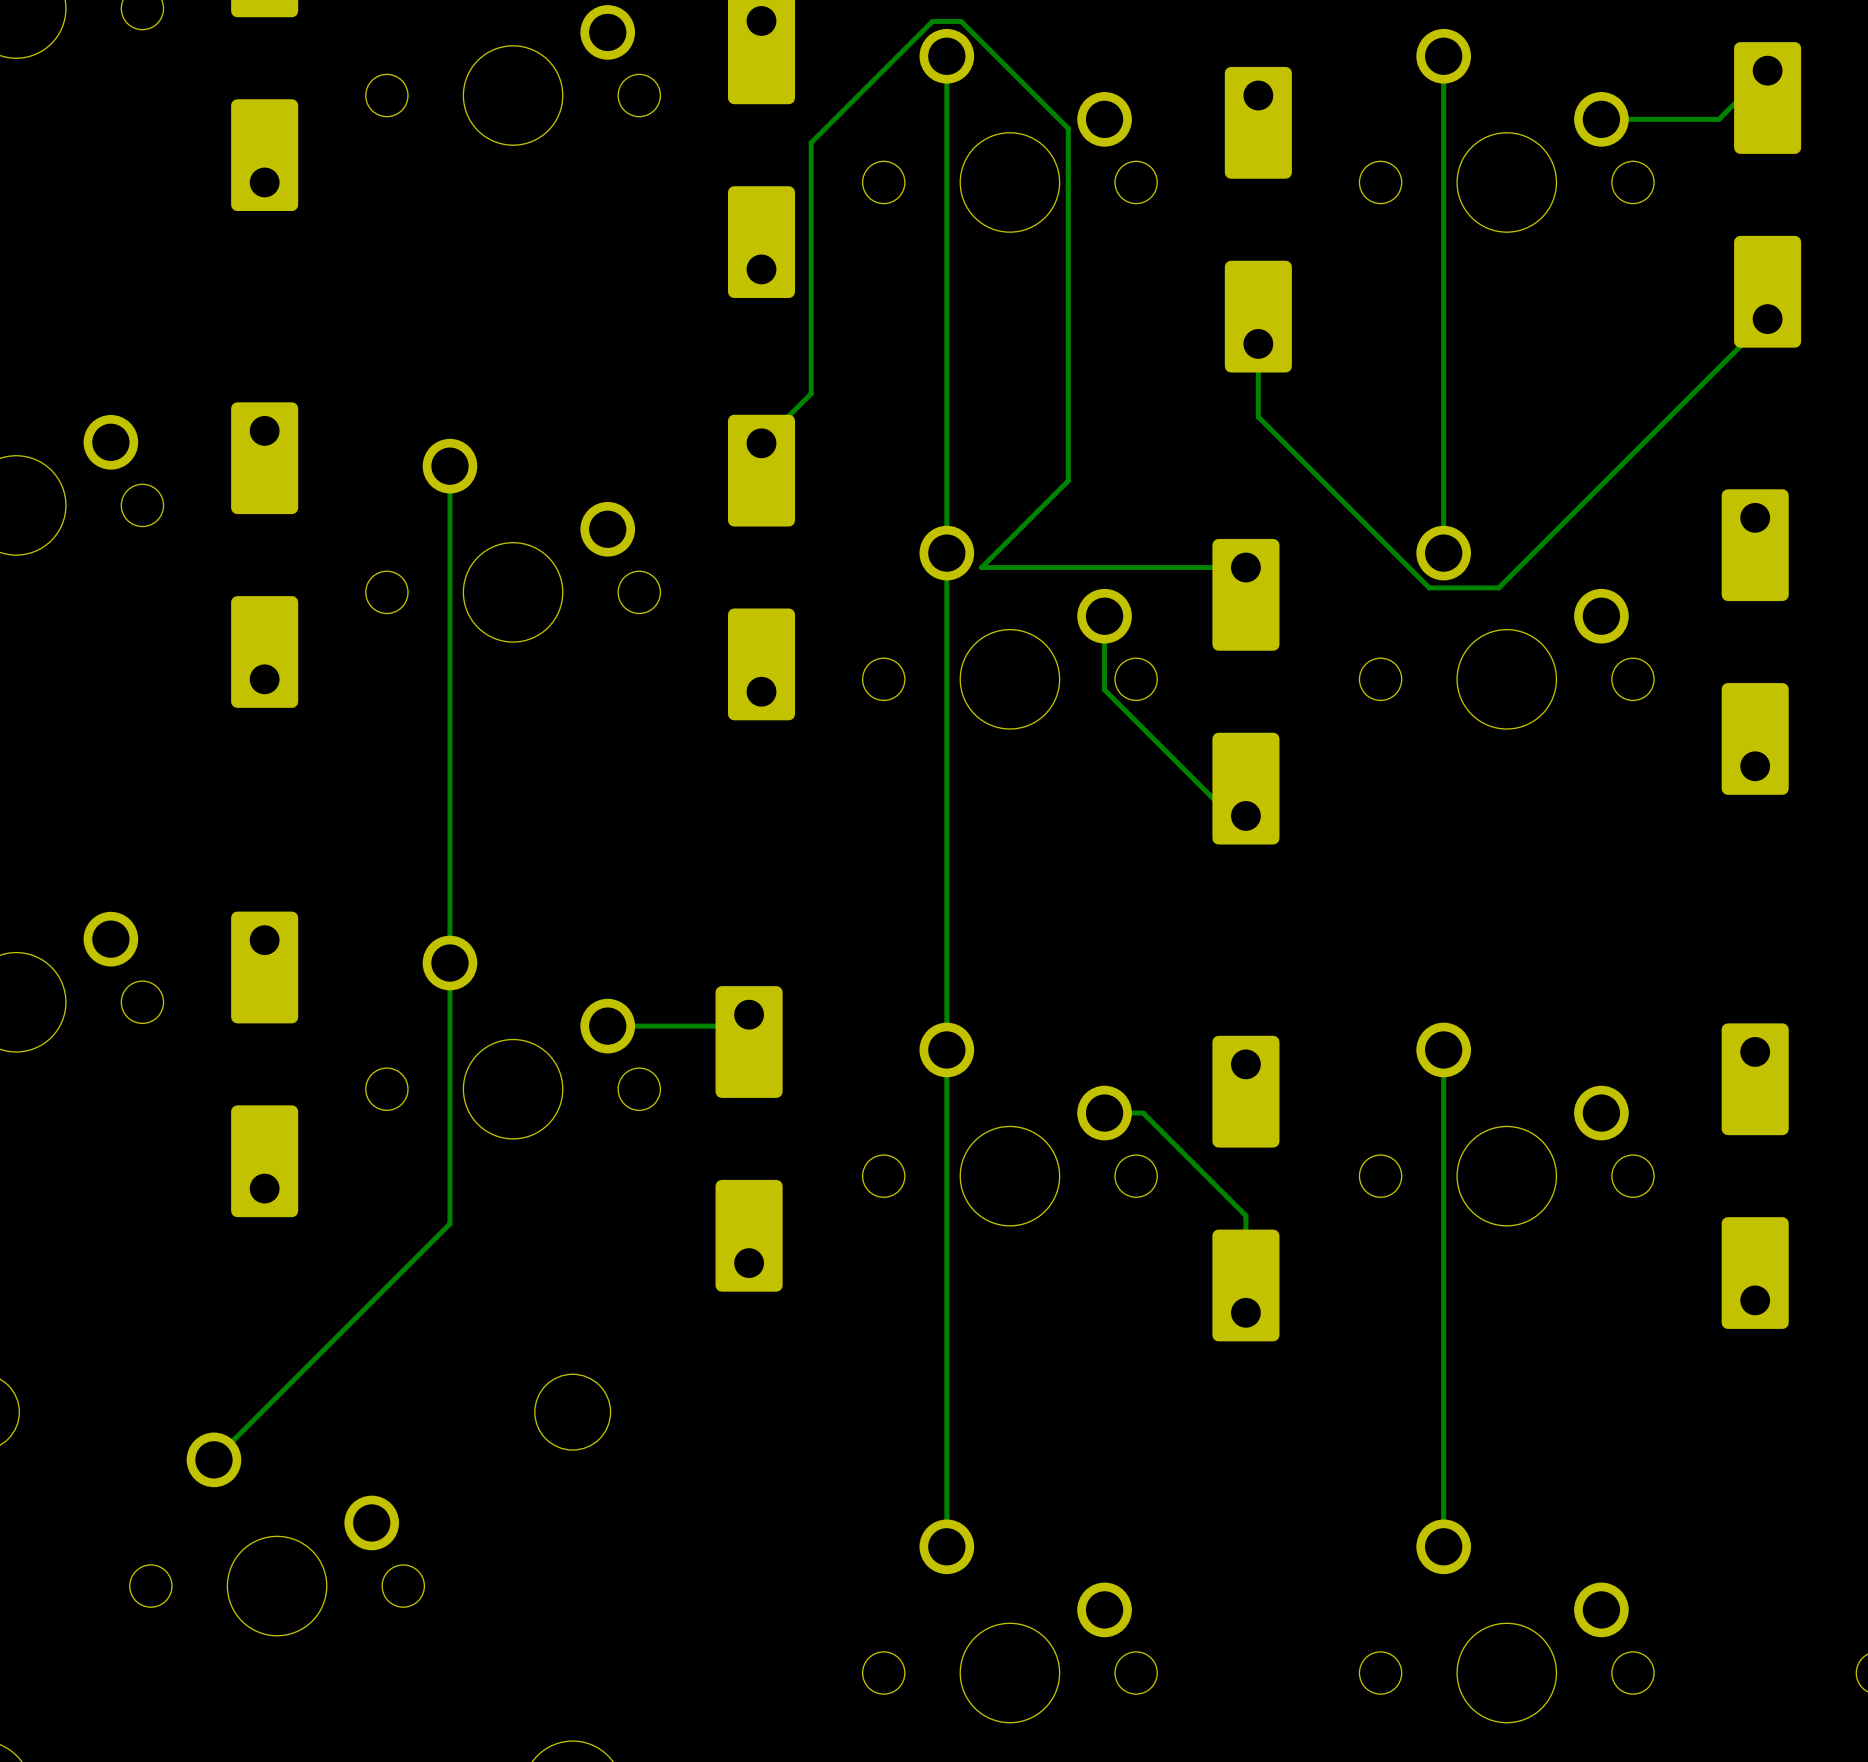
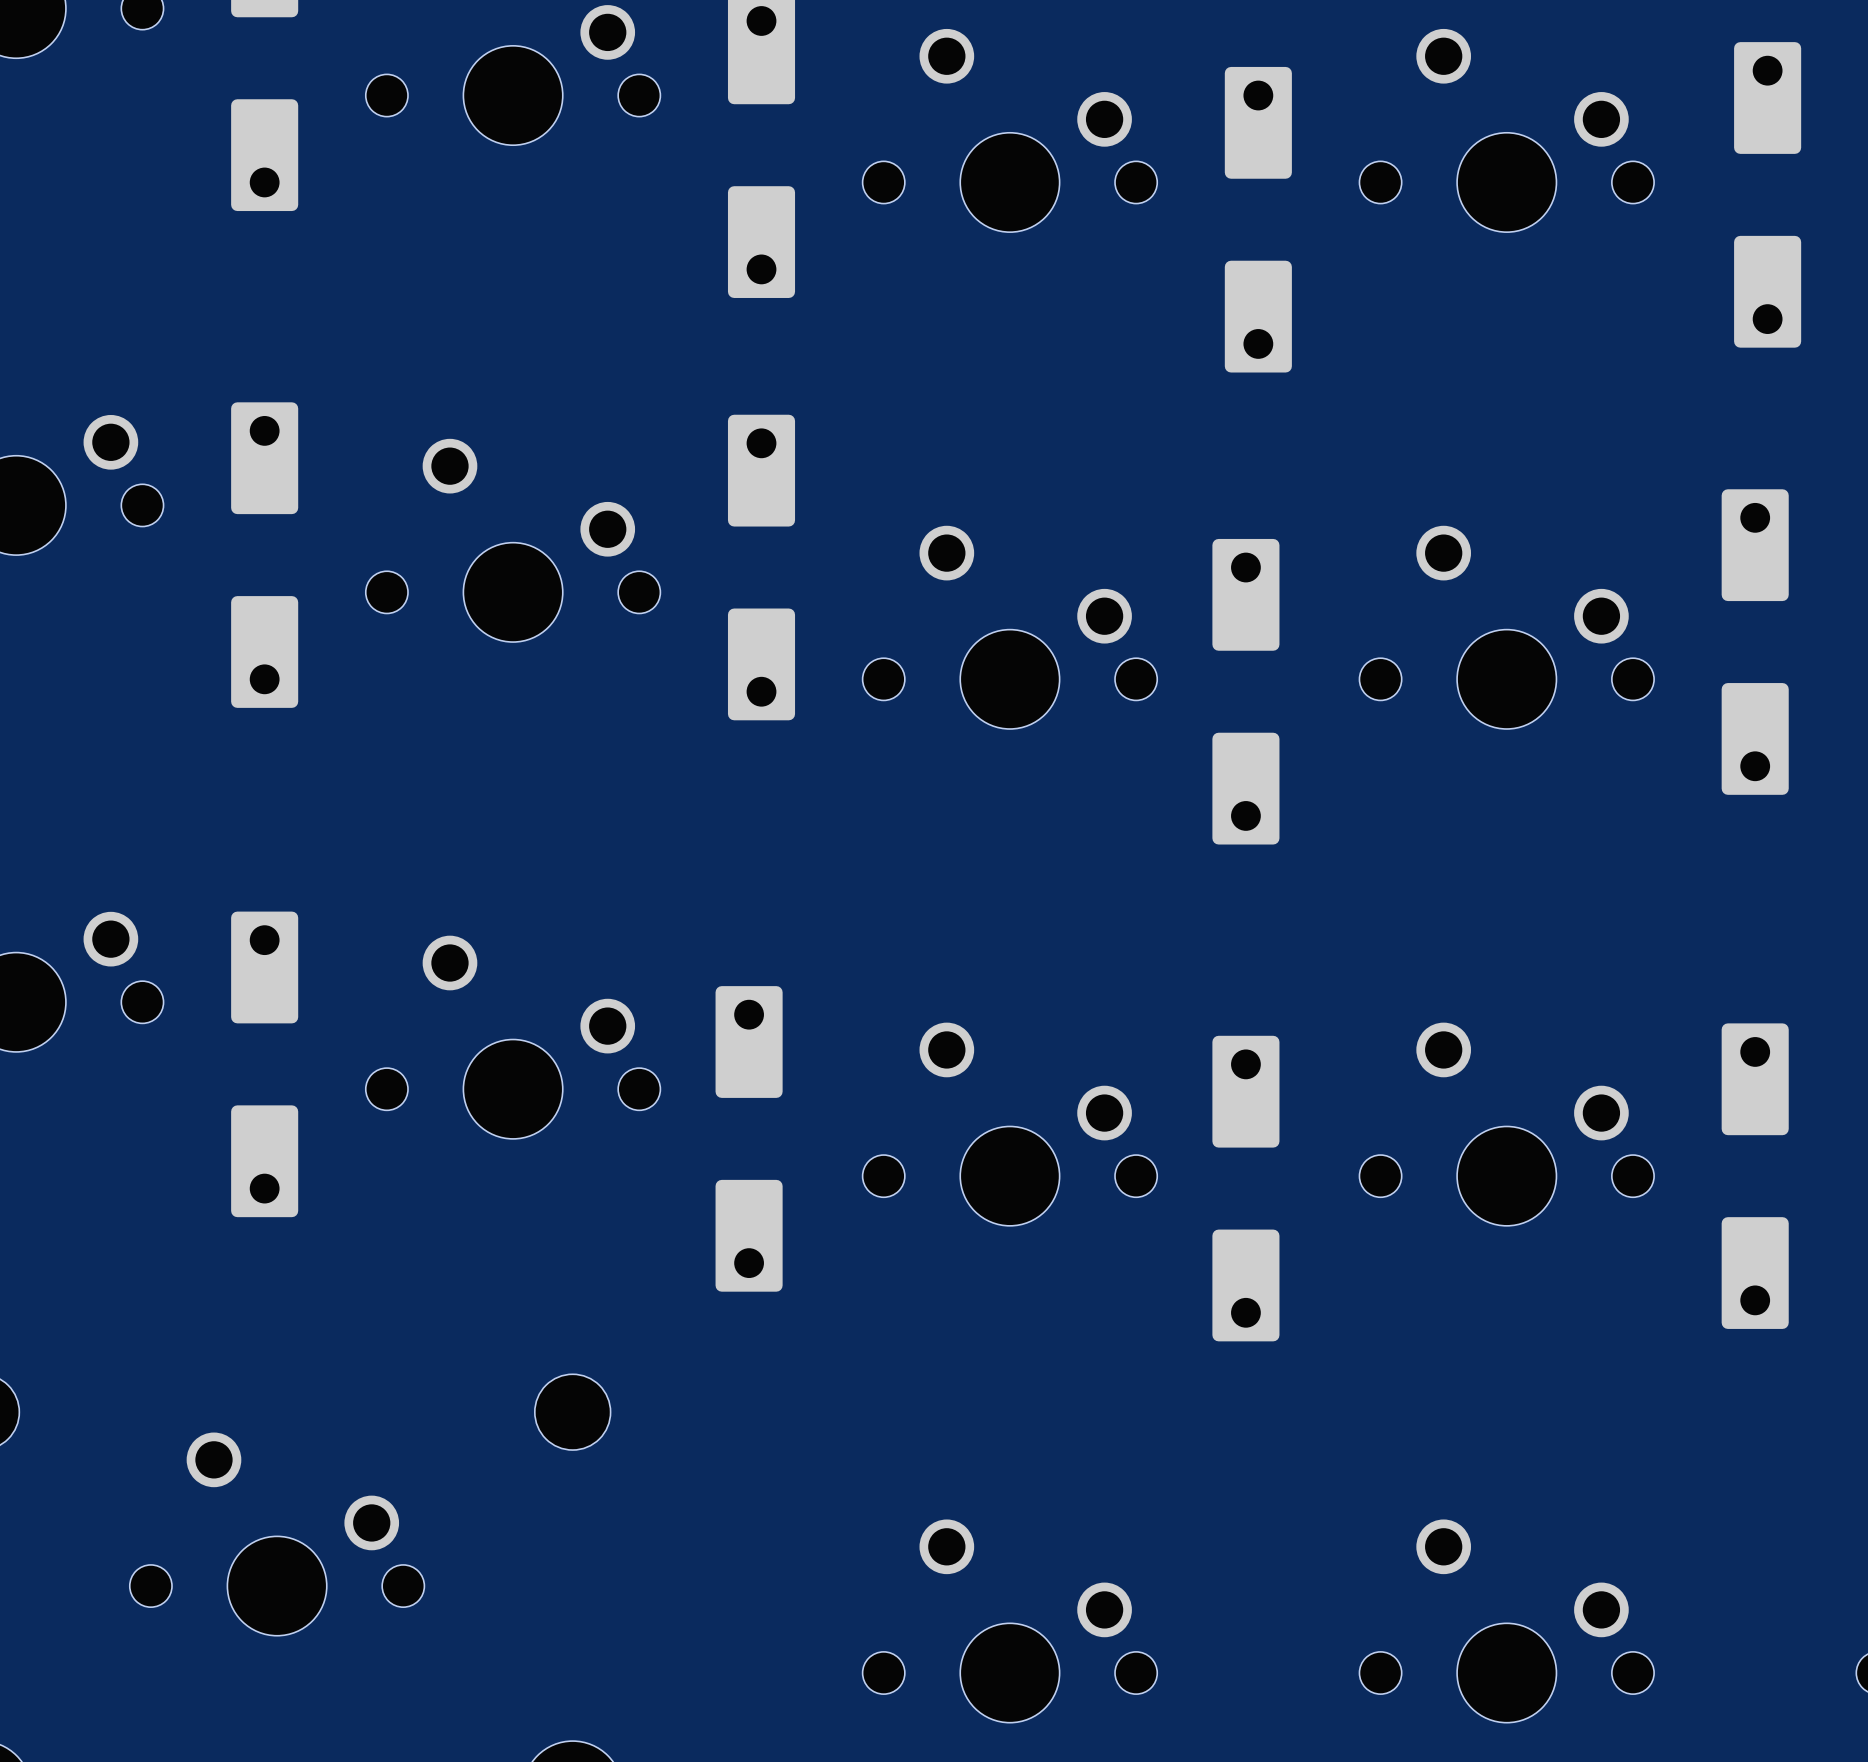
track: (946, 56) (946, 1546) -> none
track: (1443, 56) (1443, 553) -> none
track: (1767, 70) (1718, 119) (1601, 119) -> none
track: (1767, 319) (1498, 587) (1429, 587) (1258, 416) (1258, 343) -> none
track: (761, 443) (811, 393) (811, 142) (932, 21) (961, 21) (1068, 128) (1068, 480) (981, 567) (1245, 567) -> none
track: (449, 466) (449, 1223) (213, 1459) -> none
track: (1104, 616) (1104, 689) (1230, 815) (1245, 815) -> none
track: (749, 1014) (737, 1026) (607, 1026) -> none
track: (1443, 1049) (1443, 1546) -> none
track: (1104, 1113) (1143, 1113) (1245, 1215) (1245, 1312) -> none

